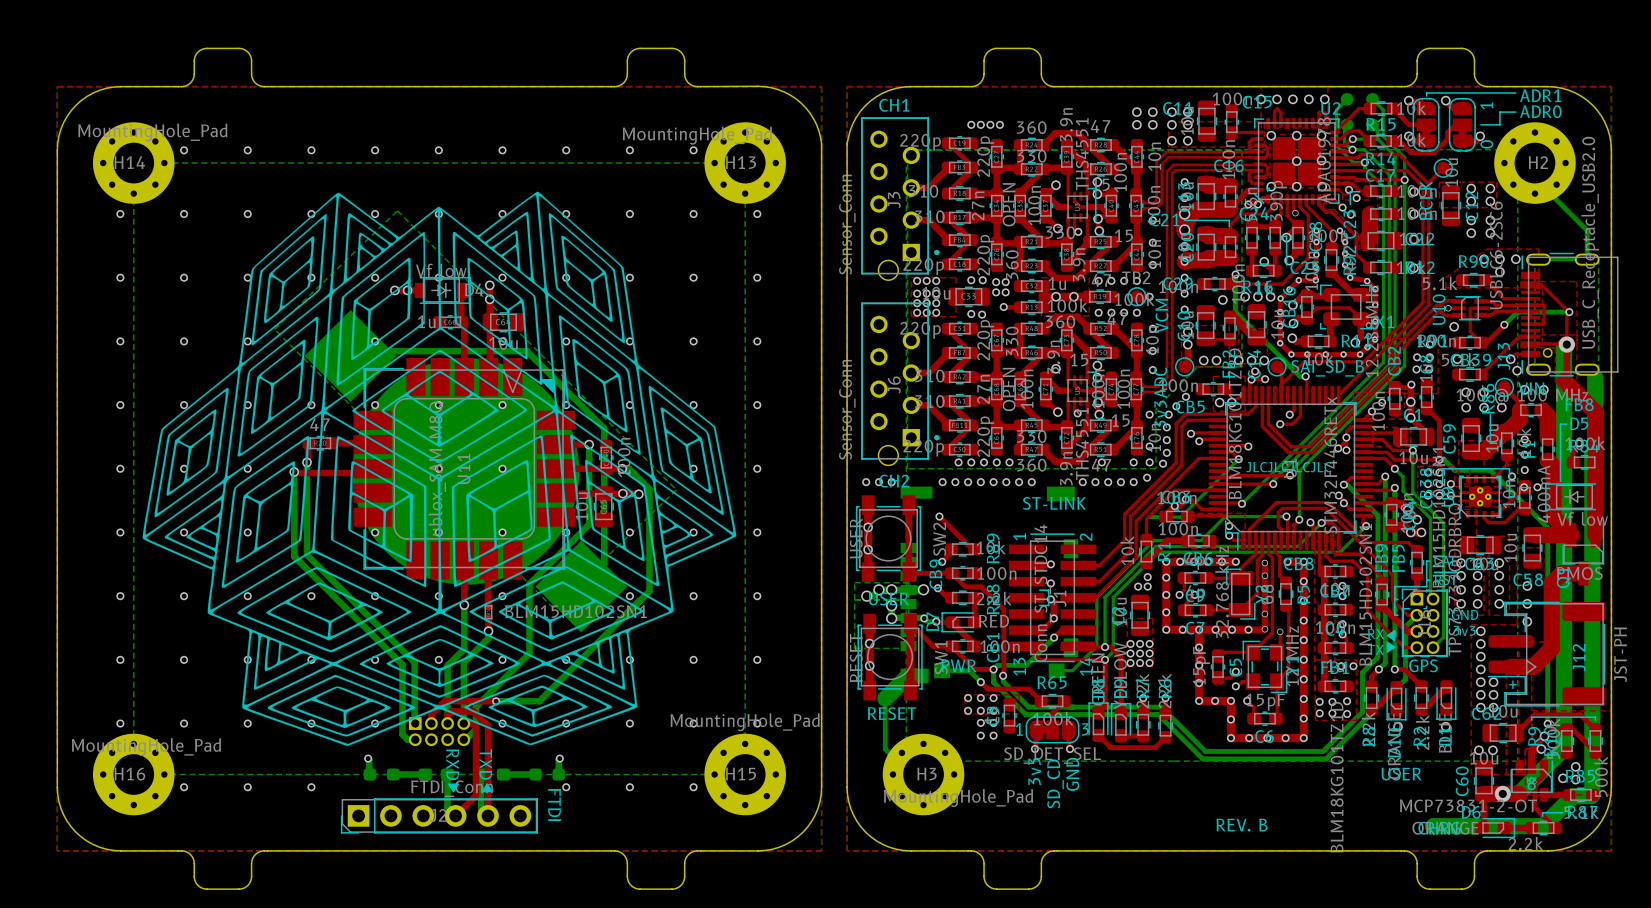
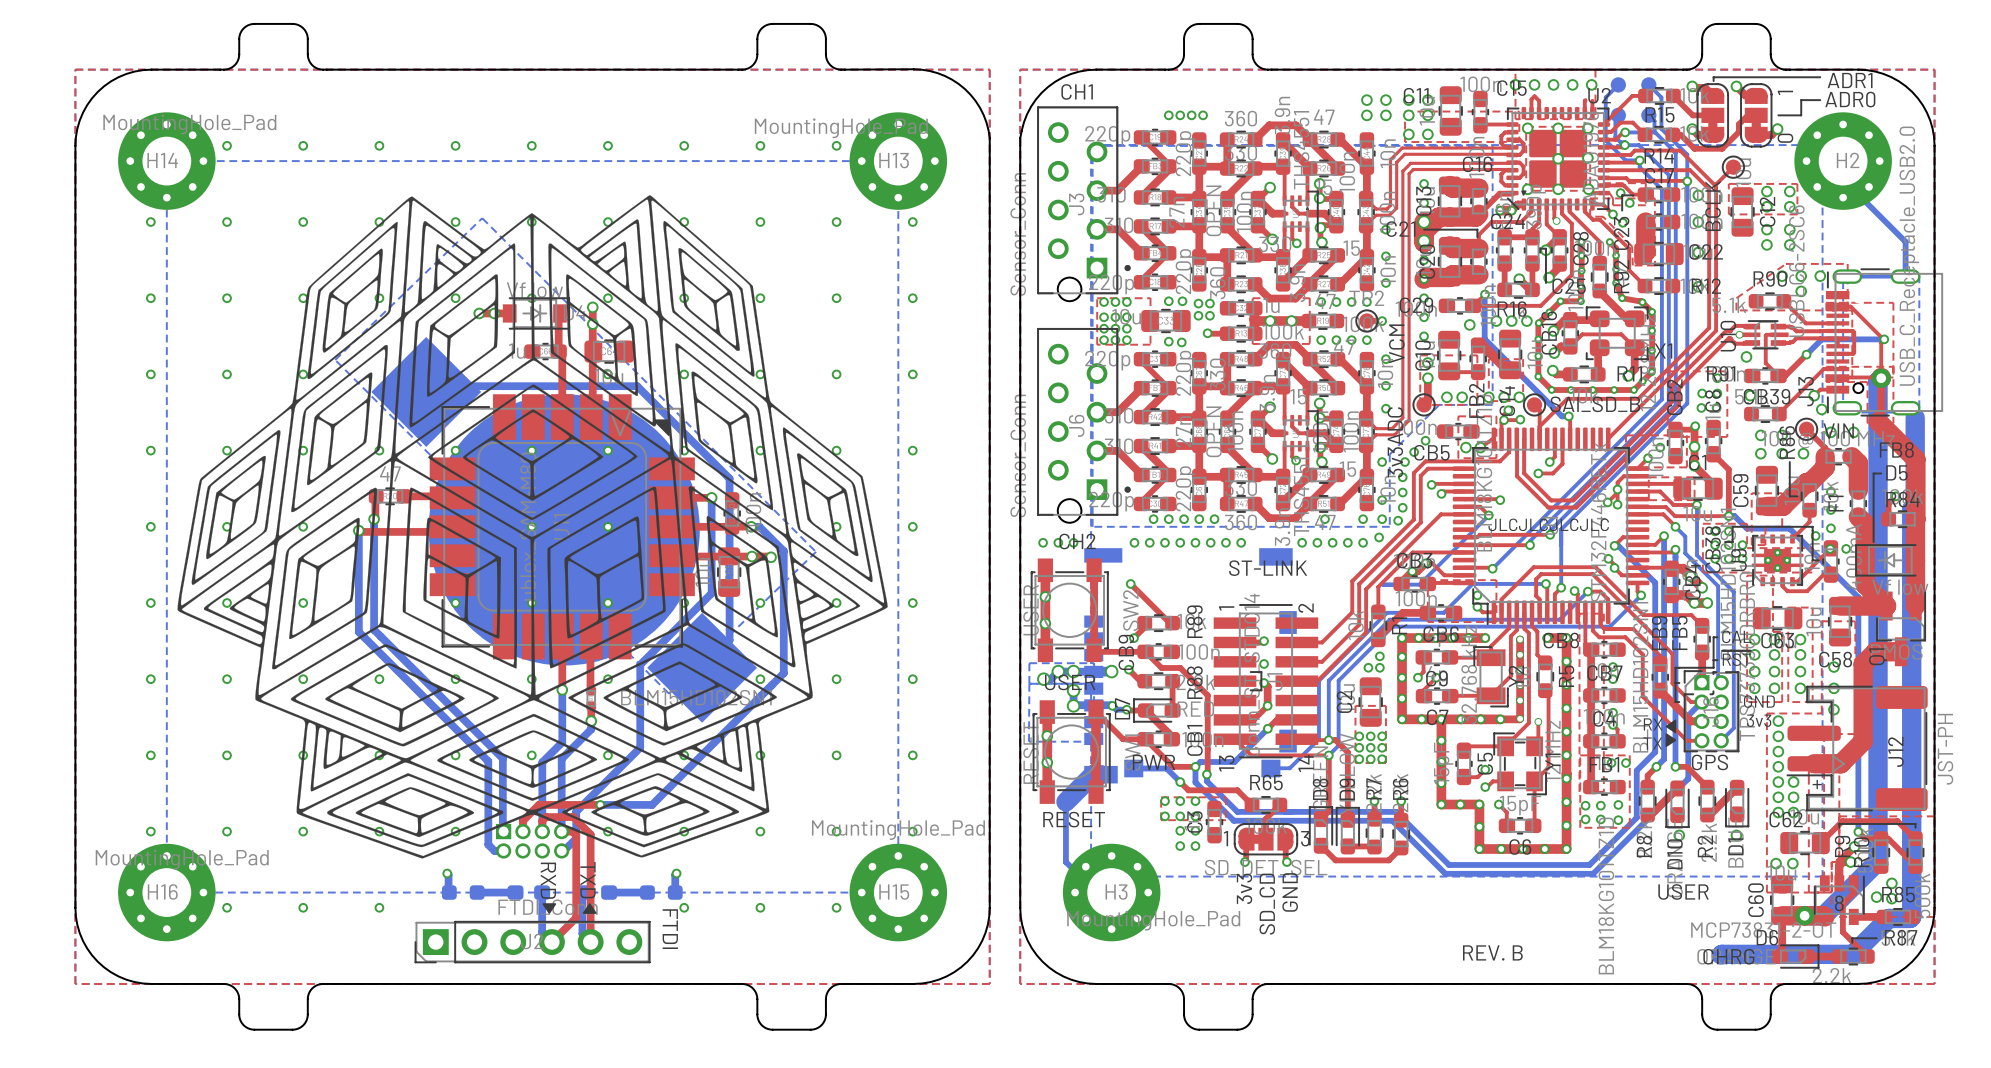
via: (375, 341) -> none

